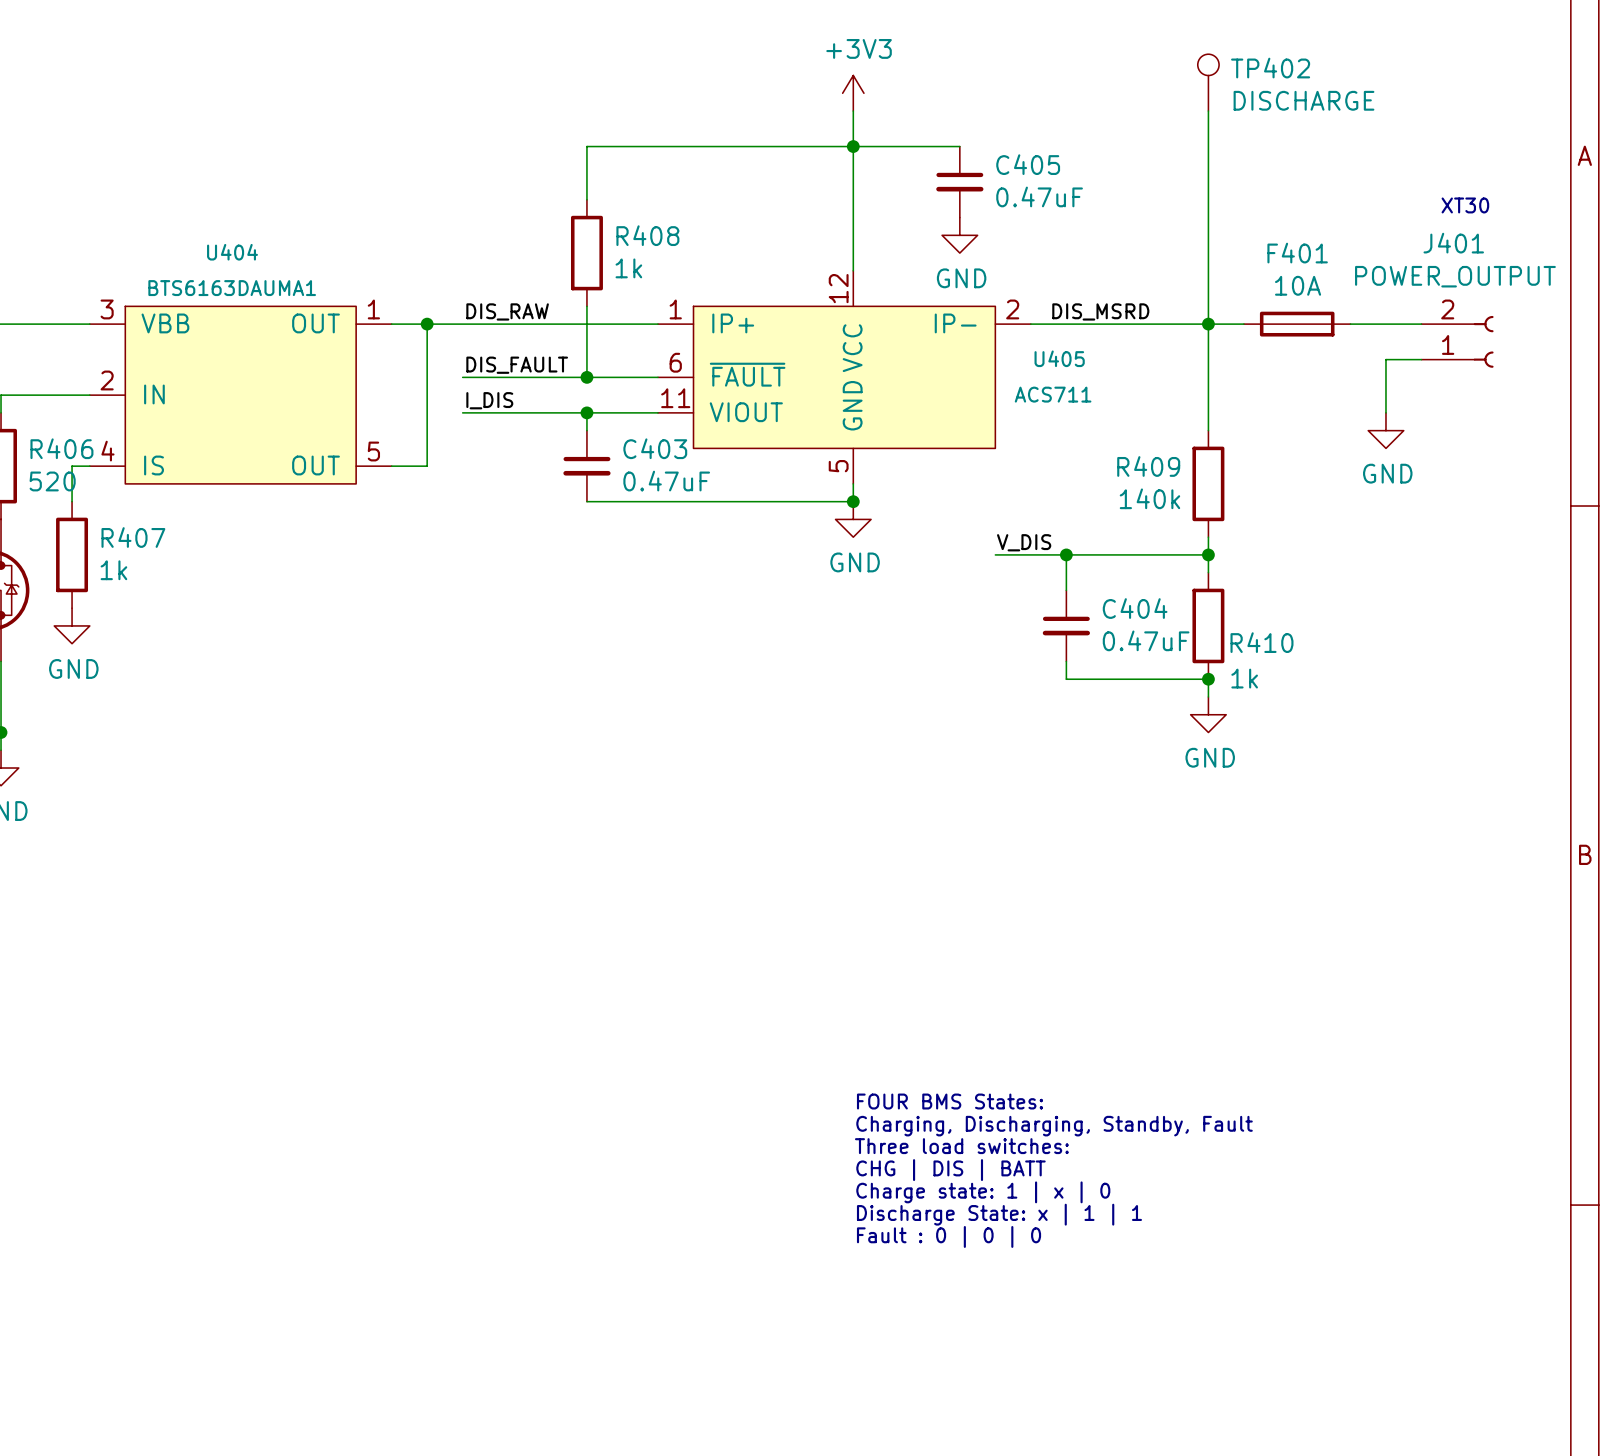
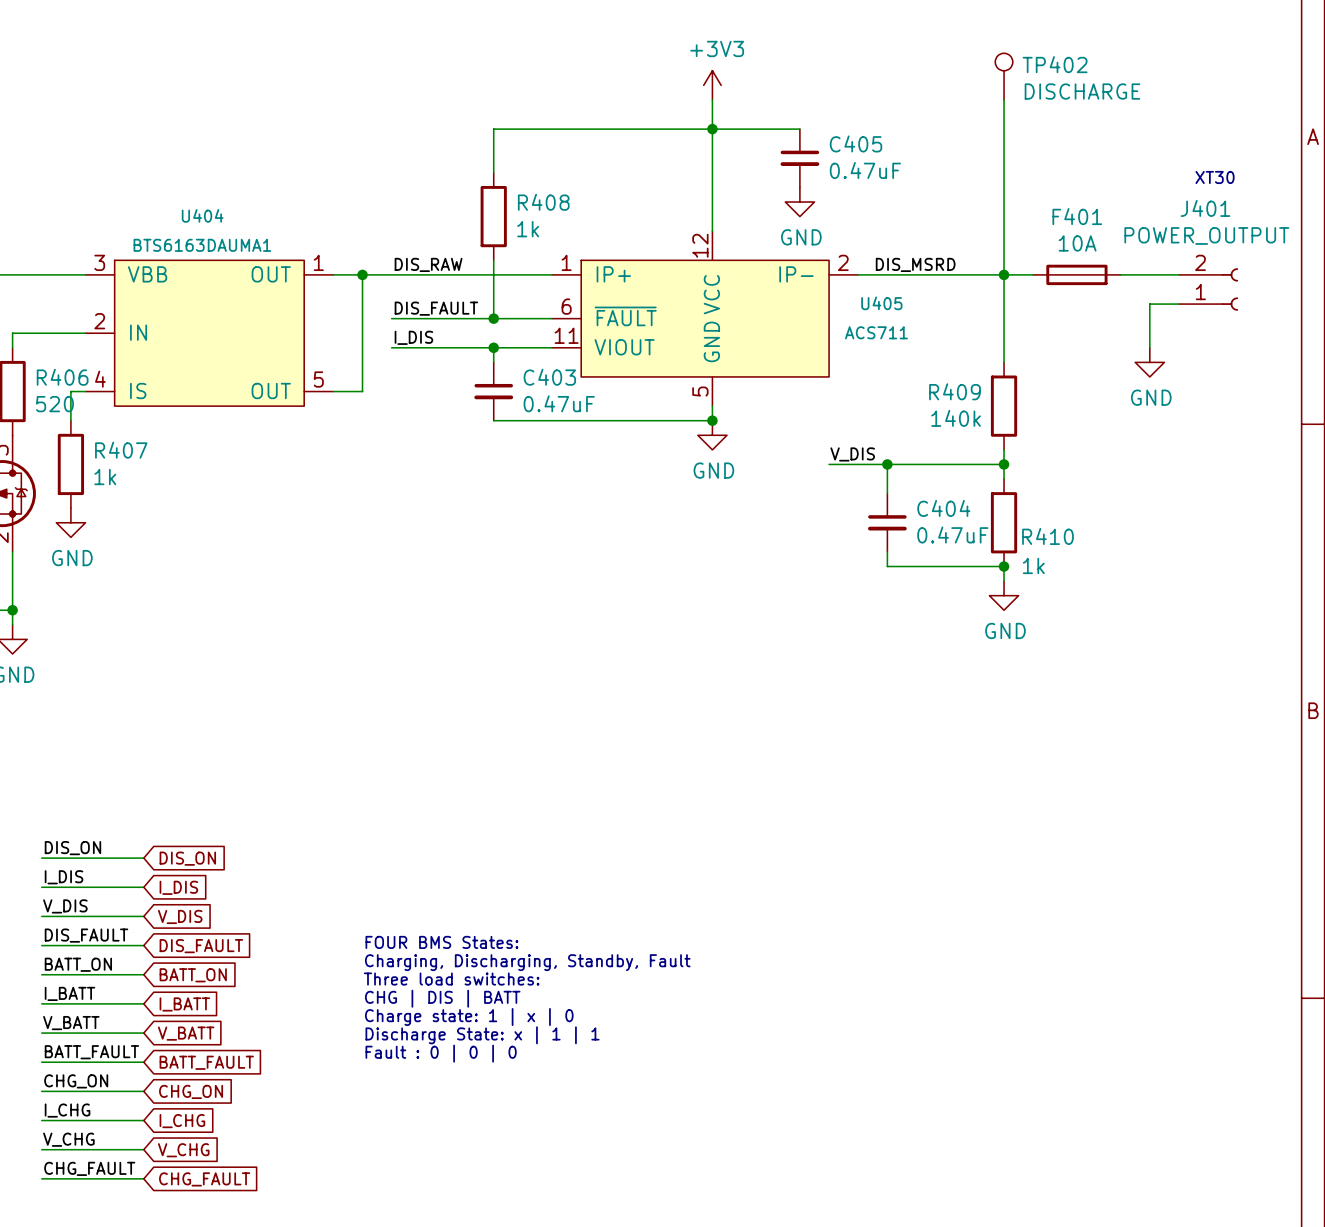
label: none -> DIS_ON (72, 848)
wire: none -> (41, 858) (143, 858)
global label: none -> DIS_ON (187, 858)
label: none -> I_DIS (64, 877)
wire: none -> (41, 887) (143, 887)
global label: none -> I_DIS (178, 887)
label: none -> V_DIS (65, 906)
text: FOUR BMS States: (950, 1101) -> none
wire: none -> (41, 916) (143, 916)
global label: none -> V_DIS (180, 916)
text: Charging, Discharging, Standby, Fault (1054, 1126) -> none
label: none -> DIS_FAULT (86, 935)
text: none -> FOUR BMS States: (441, 942)
wire: none -> (41, 945) (143, 945)
global label: none -> DIS_FAULT (201, 946)
text: Three load switches: (961, 1146) -> none
text: none -> Charging, Discharging, Standby, Fault (527, 962)
label: none -> BATT_ON (78, 964)
text: CHG | DIS | BATT (950, 1170) -> none
wire: none -> (41, 974) (143, 974)
global label: none -> BATT_ON (193, 975)
text: none -> Three load switches: (451, 979)
text: Charge state: 1 | x | 0 (983, 1192) -> none
label: none -> I_BATT (69, 993)
text: none -> CHG | DIS | BATT (442, 998)
wire: none -> (41, 1003) (143, 1003)
global label: none -> I_BATT (184, 1004)
text: Discharge State: x | 1 | 1 (999, 1214) -> none
text: none -> Charge state: 1 | x | 0 (469, 1017)
label: none -> V_BATT (71, 1023)
text: Fault : 0 | 0 | 0 (949, 1236) -> none
wire: none -> (41, 1033) (143, 1033)
global label: none -> V_BATT (186, 1033)
text: none -> Discharge State: x | 1 | 1 (482, 1035)
label: none -> BATT_FAULT (91, 1052)
text: none -> Fault : 0 | 0 | 0 (441, 1053)
wire: none -> (41, 1062) (143, 1062)
global label: none -> BATT_FAULT (206, 1062)
label: none -> CHG_ON (76, 1081)
wire: none -> (41, 1091) (143, 1091)
global label: none -> CHG_ON (191, 1091)
label: none -> I_CHG (67, 1110)
wire: none -> (41, 1120) (143, 1120)
global label: none -> I_CHG (182, 1121)
label: none -> V_CHG (68, 1139)
wire: none -> (41, 1149) (143, 1149)
global label: none -> V_CHG (183, 1150)
label: none -> CHG_FAULT (89, 1168)
wire: none -> (41, 1178) (143, 1178)
global label: none -> CHG_FAULT (204, 1179)

